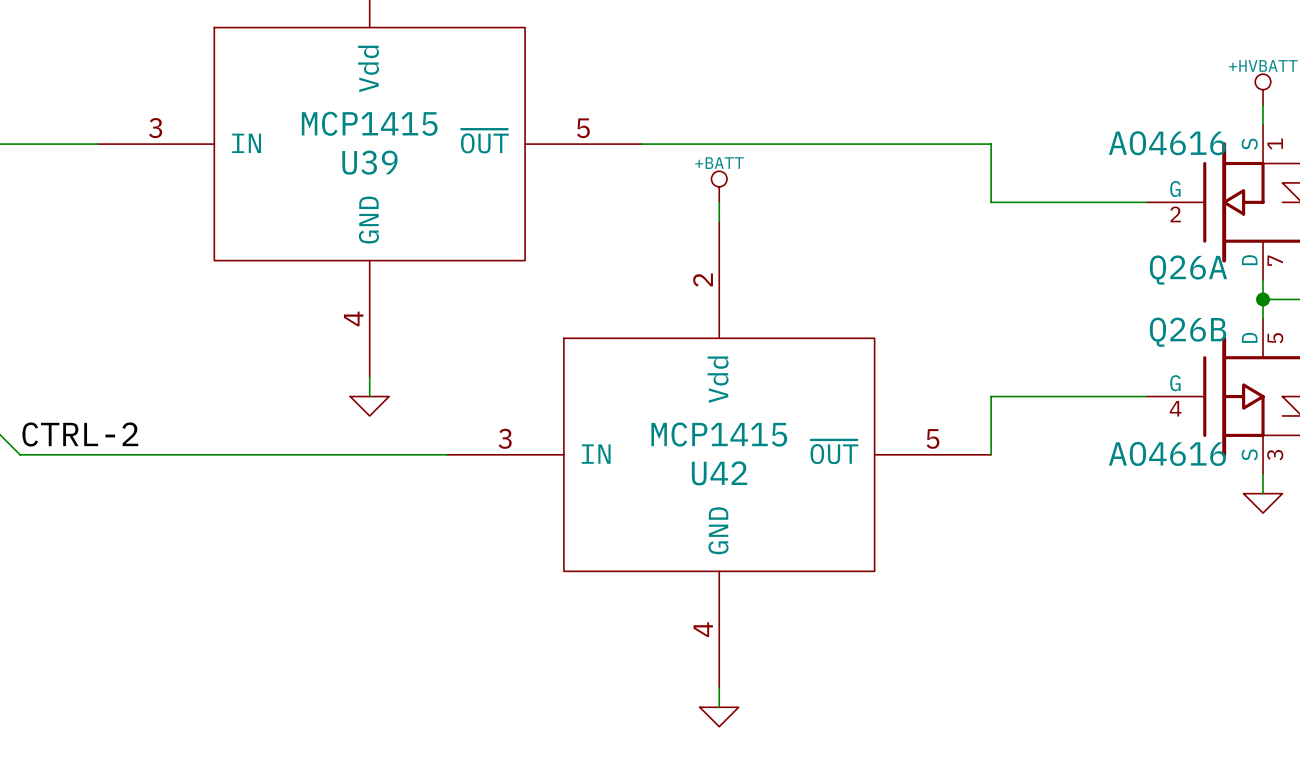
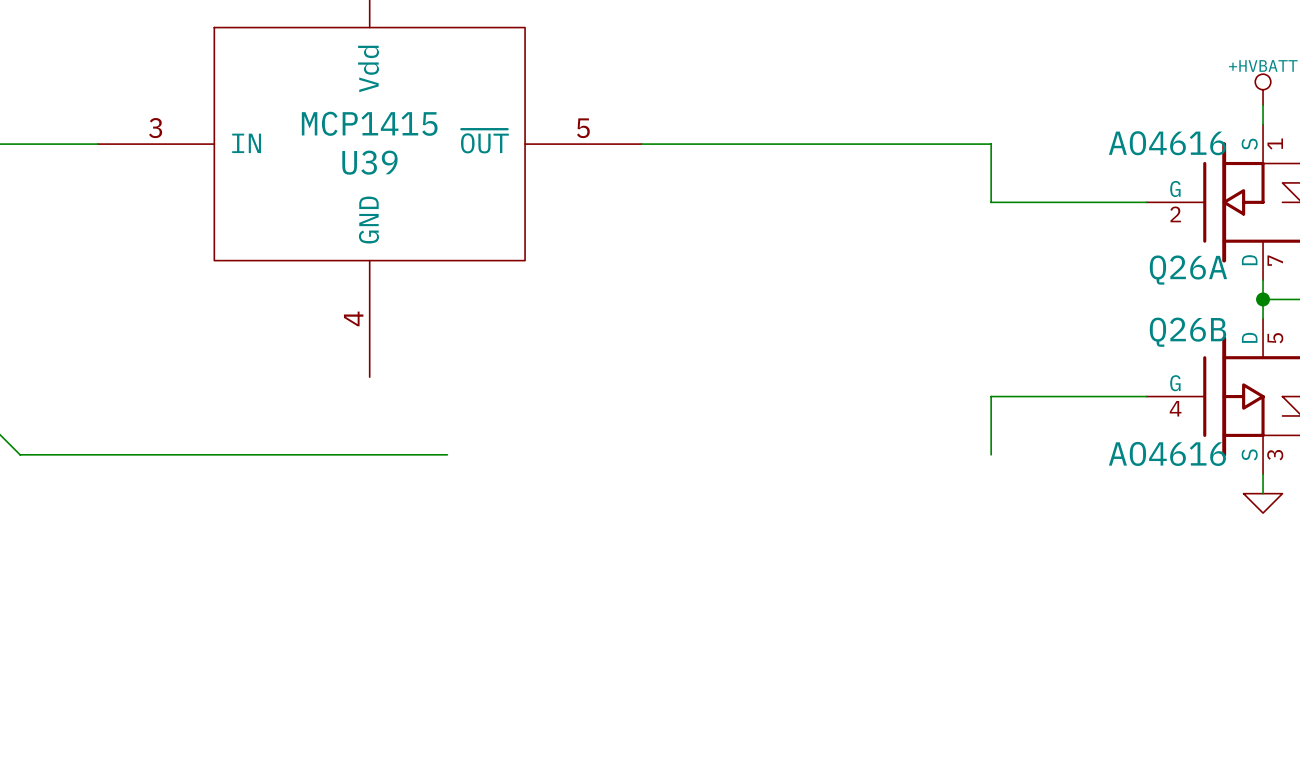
power symbol: +BATT (719, 186) -> none
wire: (719, 202) (719, 221) -> none
wire: (369, 377) (369, 396) -> none
power symbol: (369, 406) -> none
label: CTRL-2 (80, 434) -> none
U42: MCP1415 (719, 454) -> none
wire: (719, 687) (719, 707) -> none
power symbol: (719, 716) -> none

